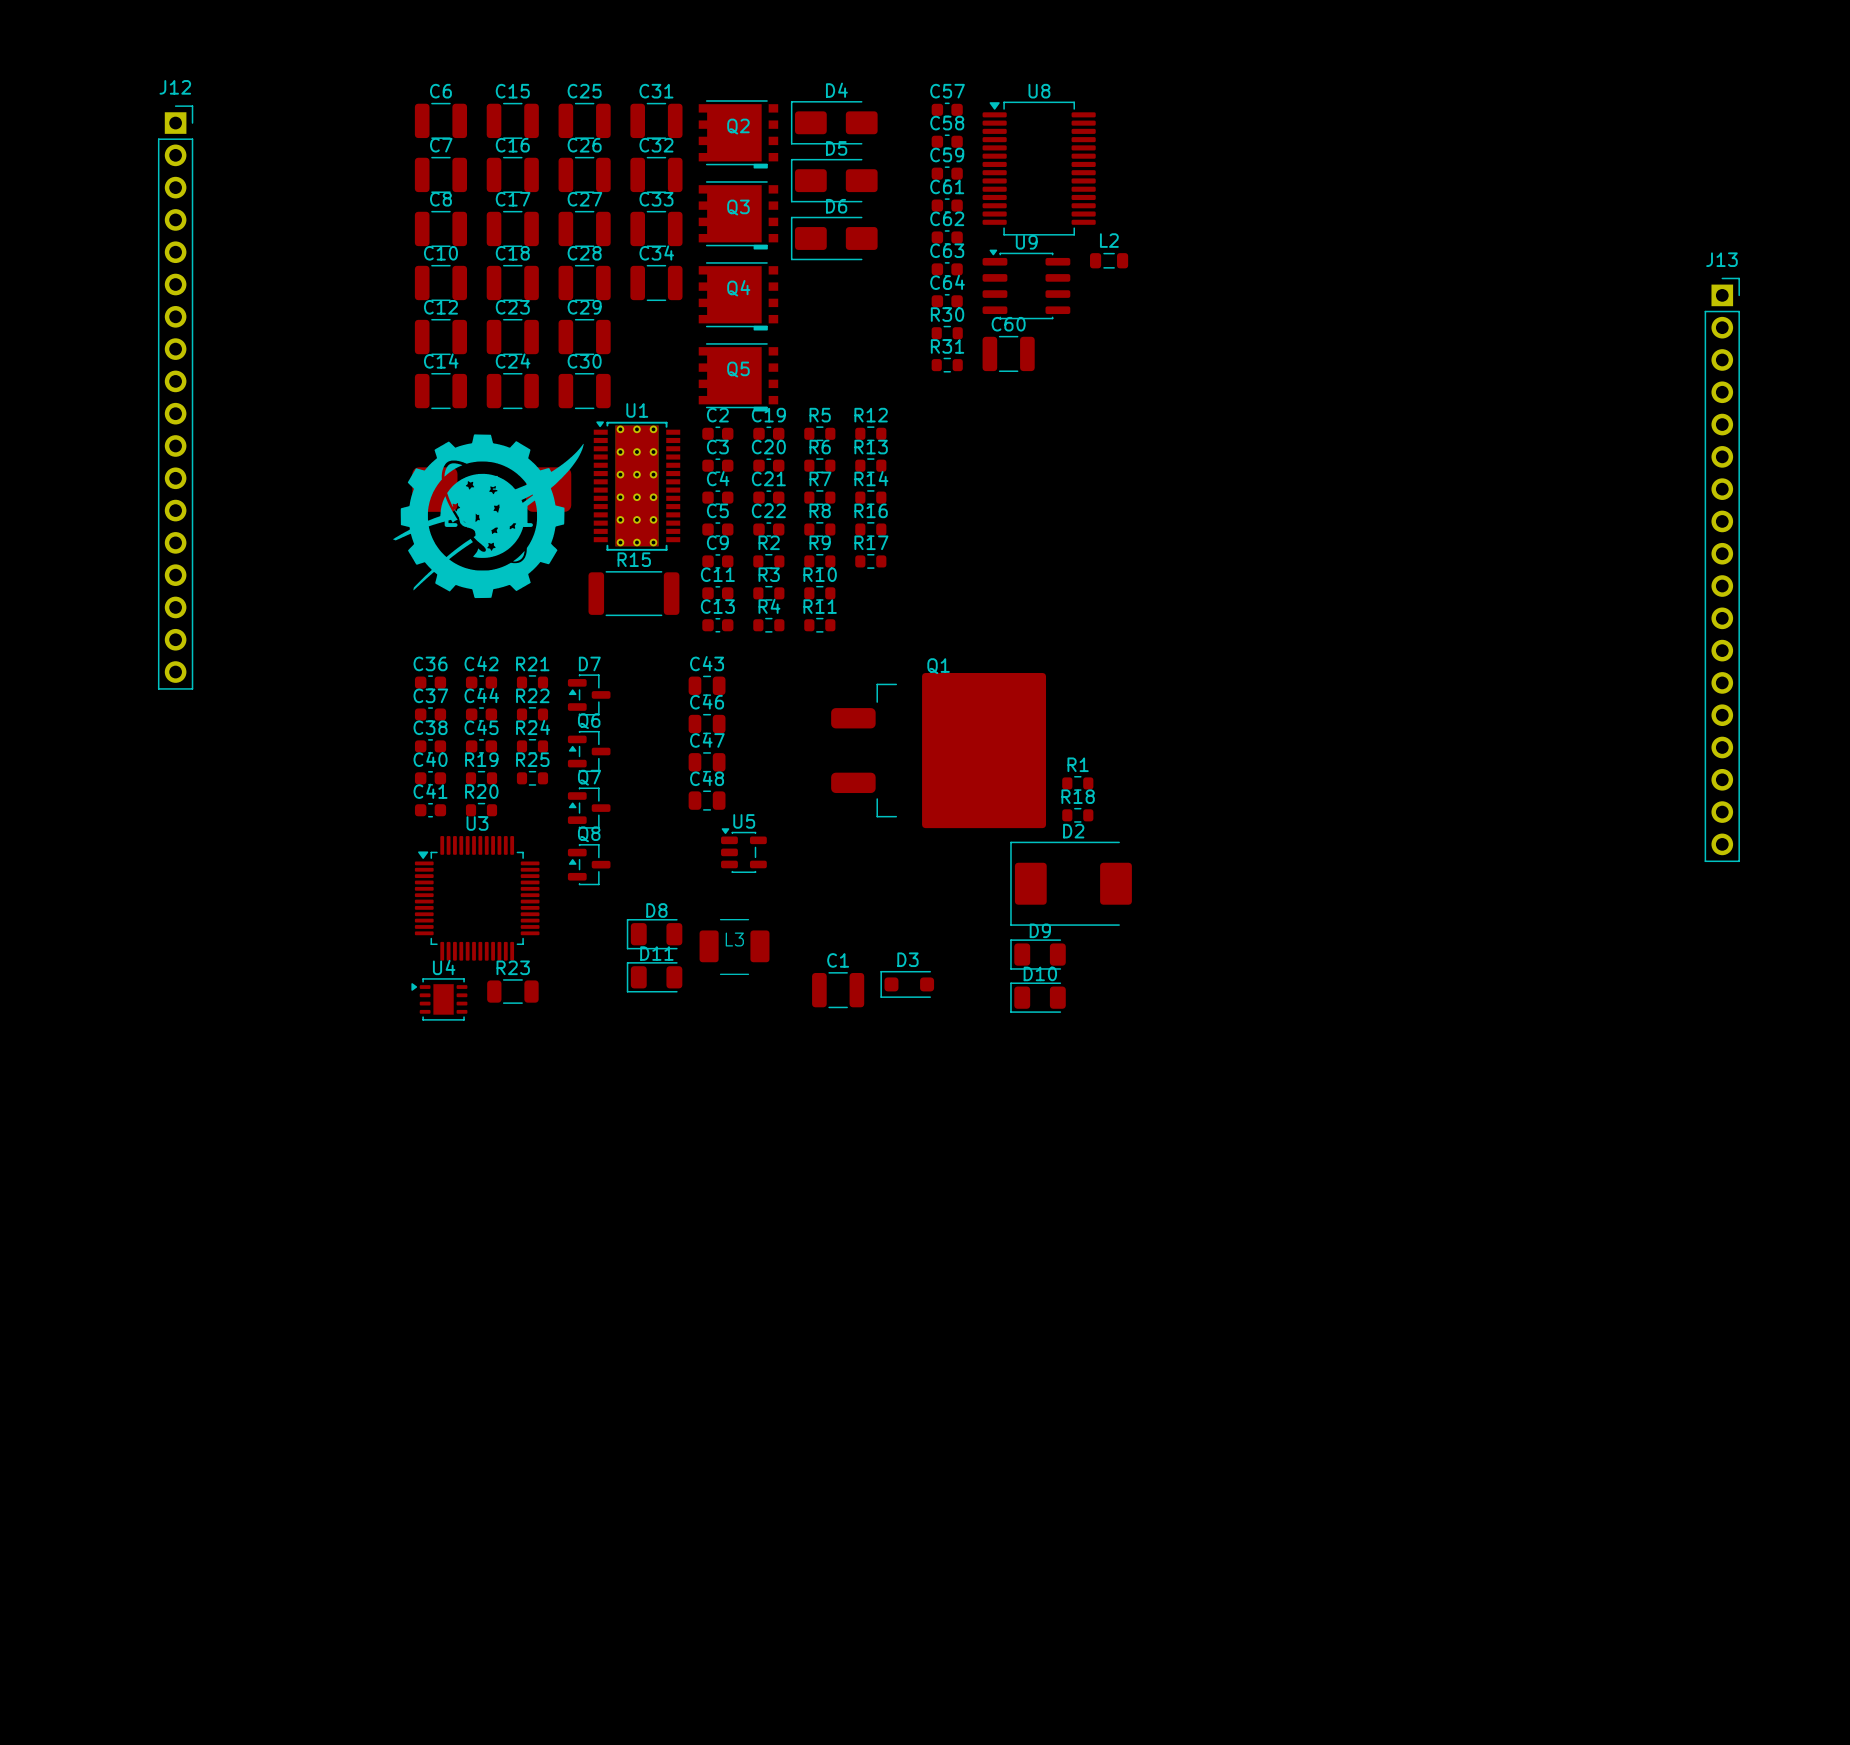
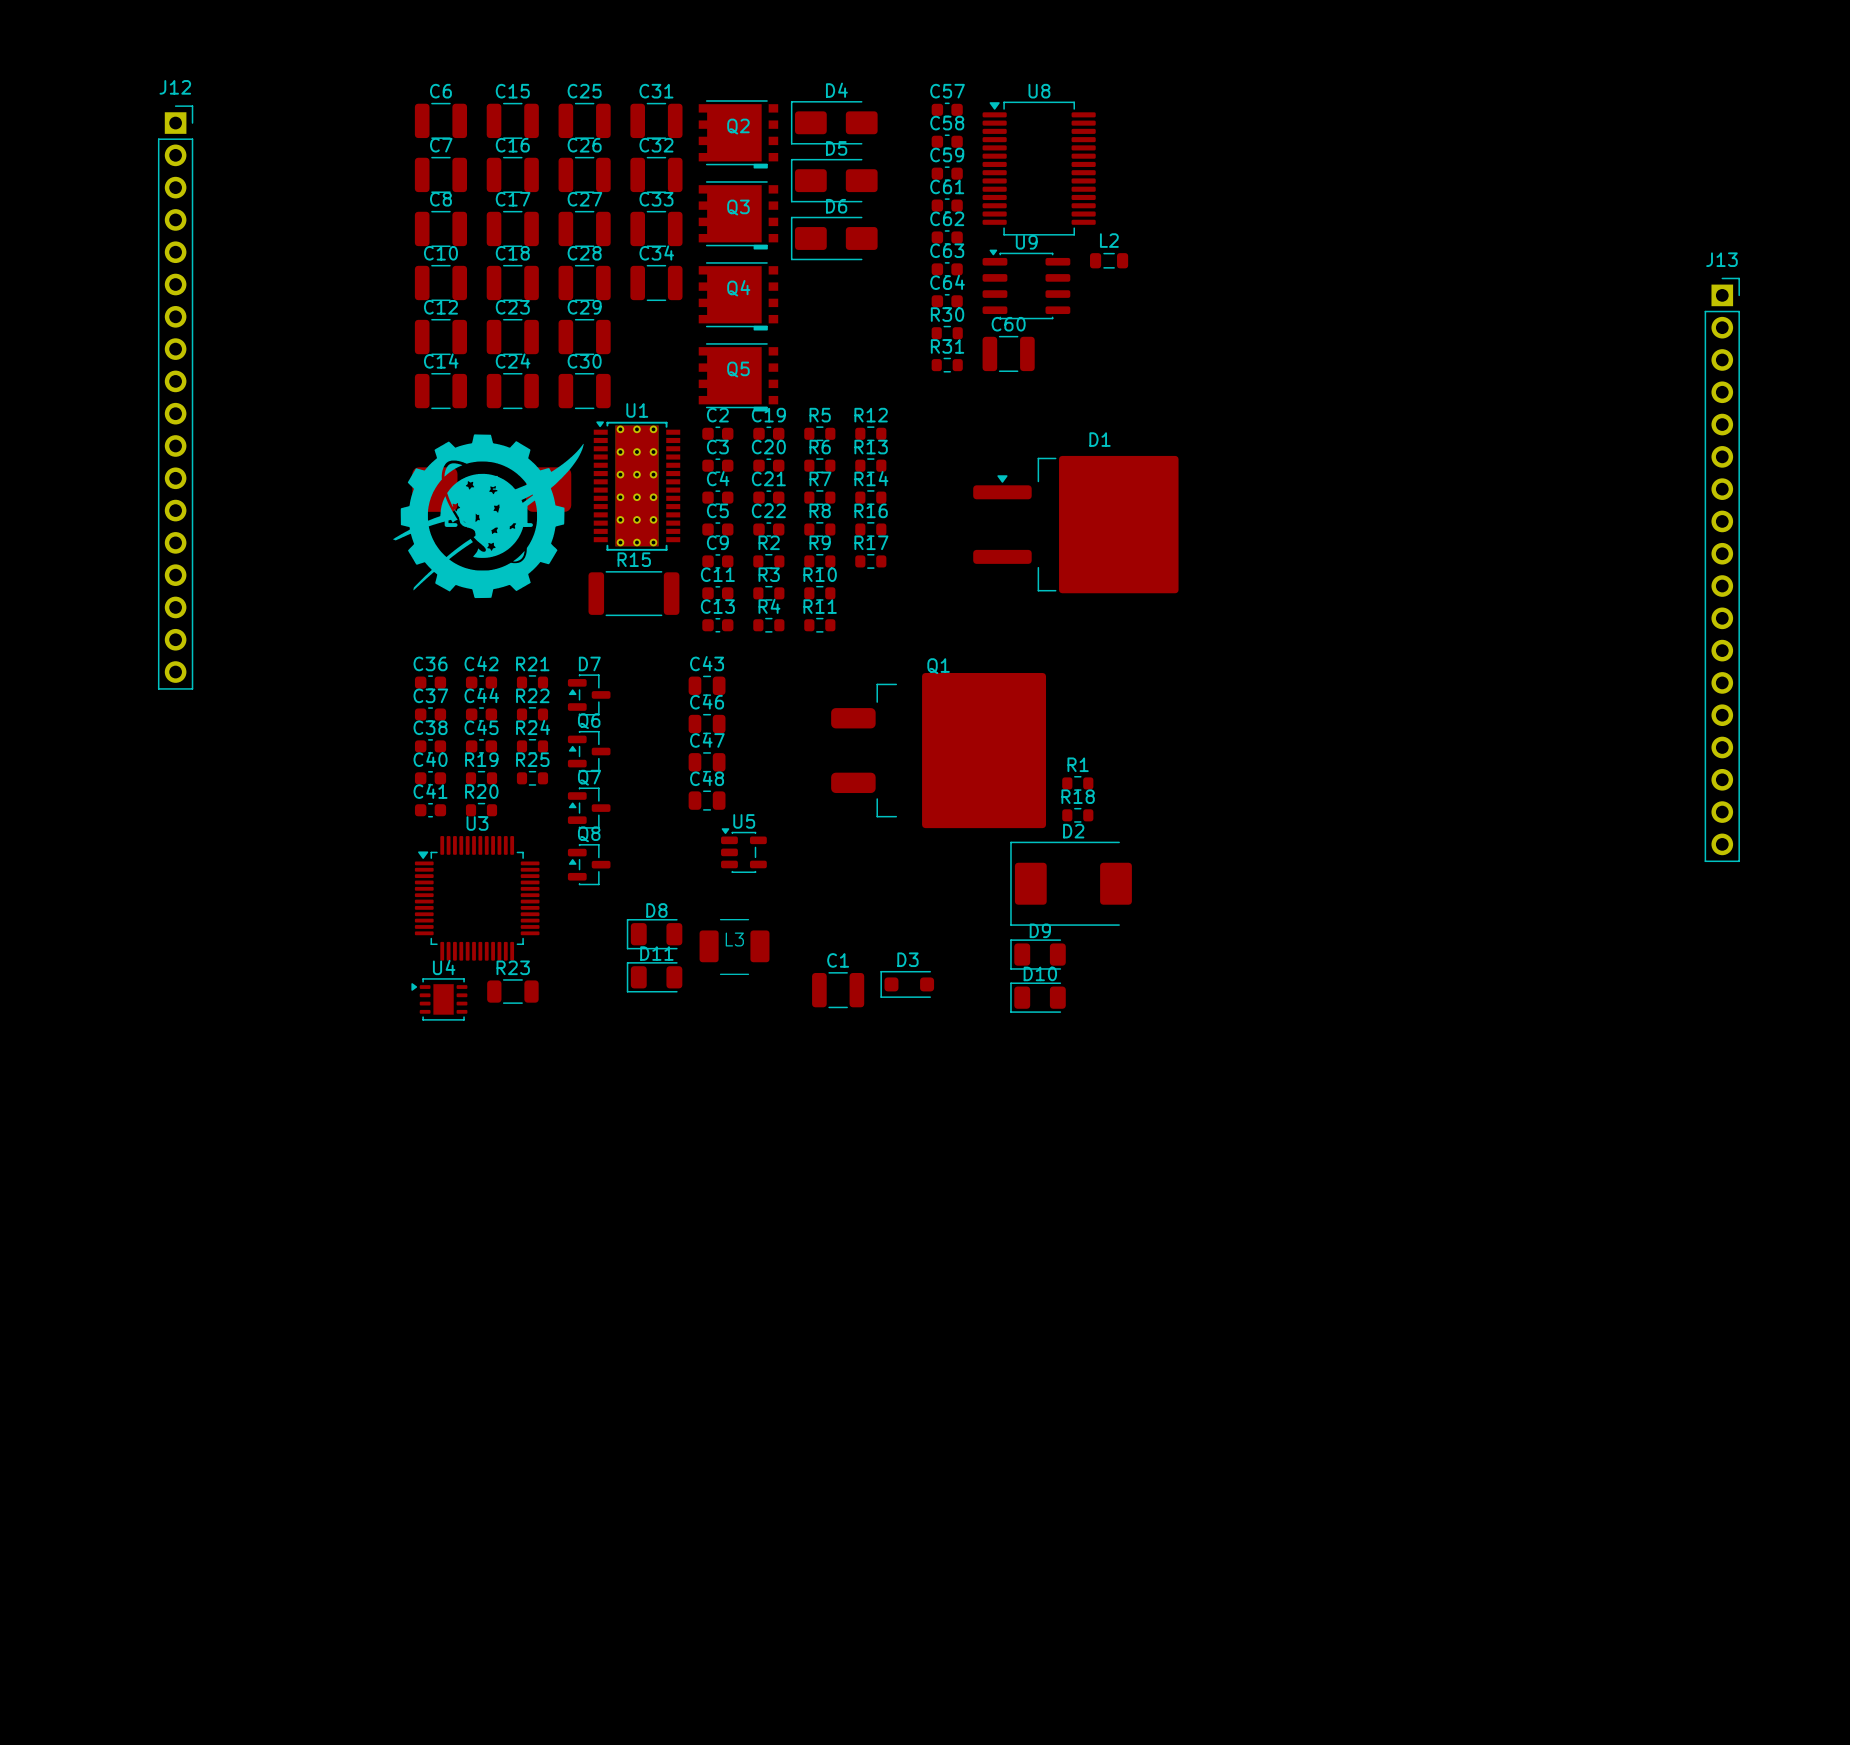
D1: none -> (1075, 524)

